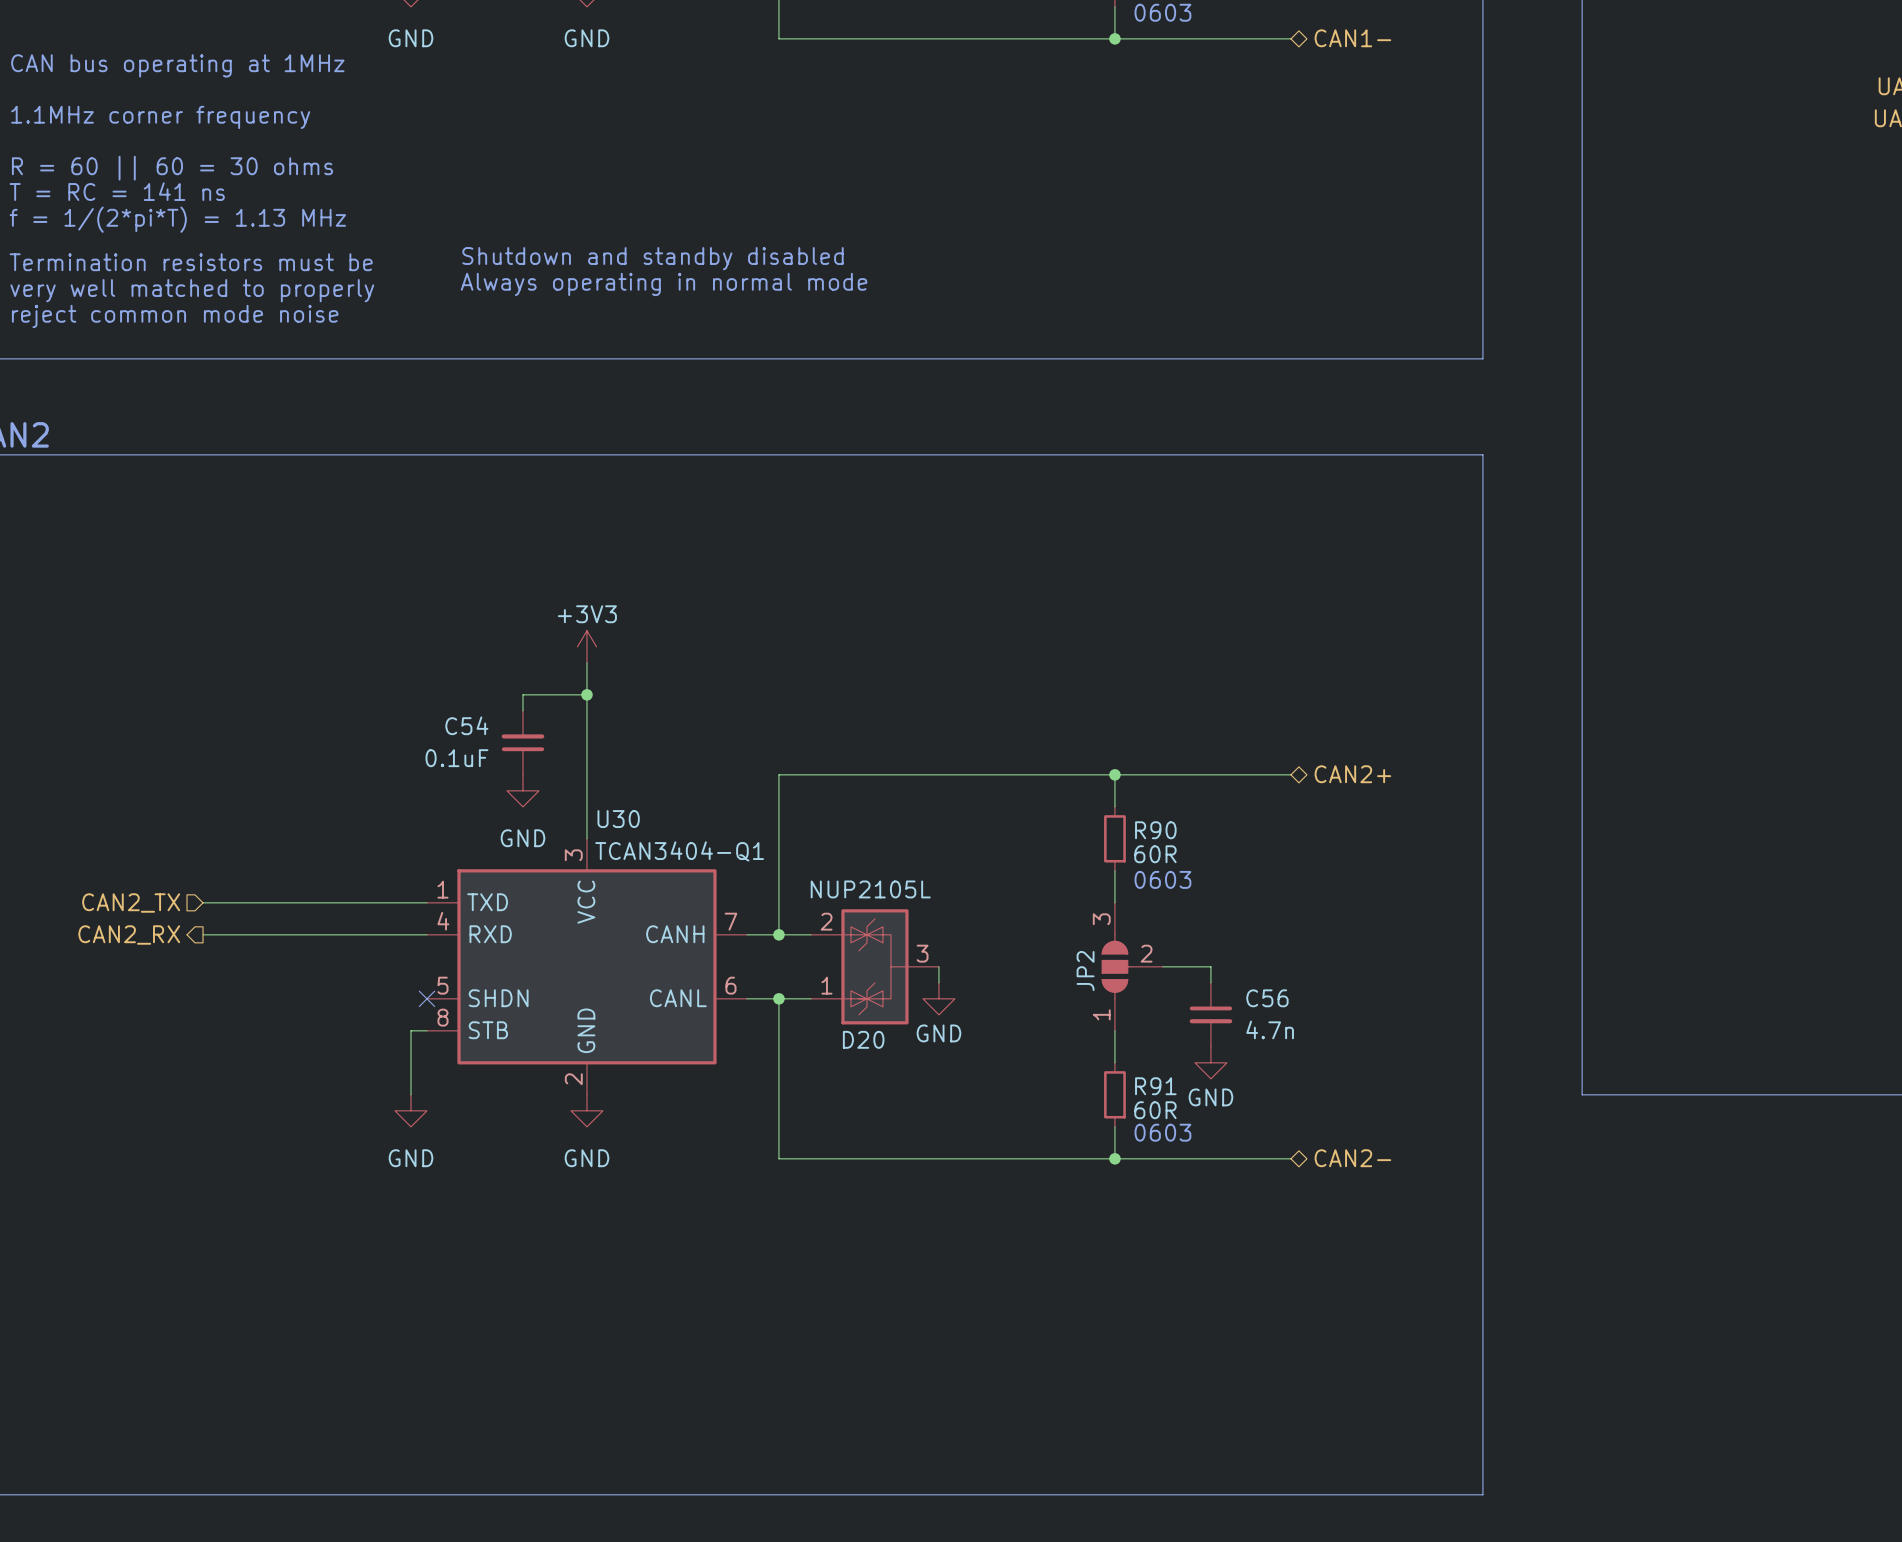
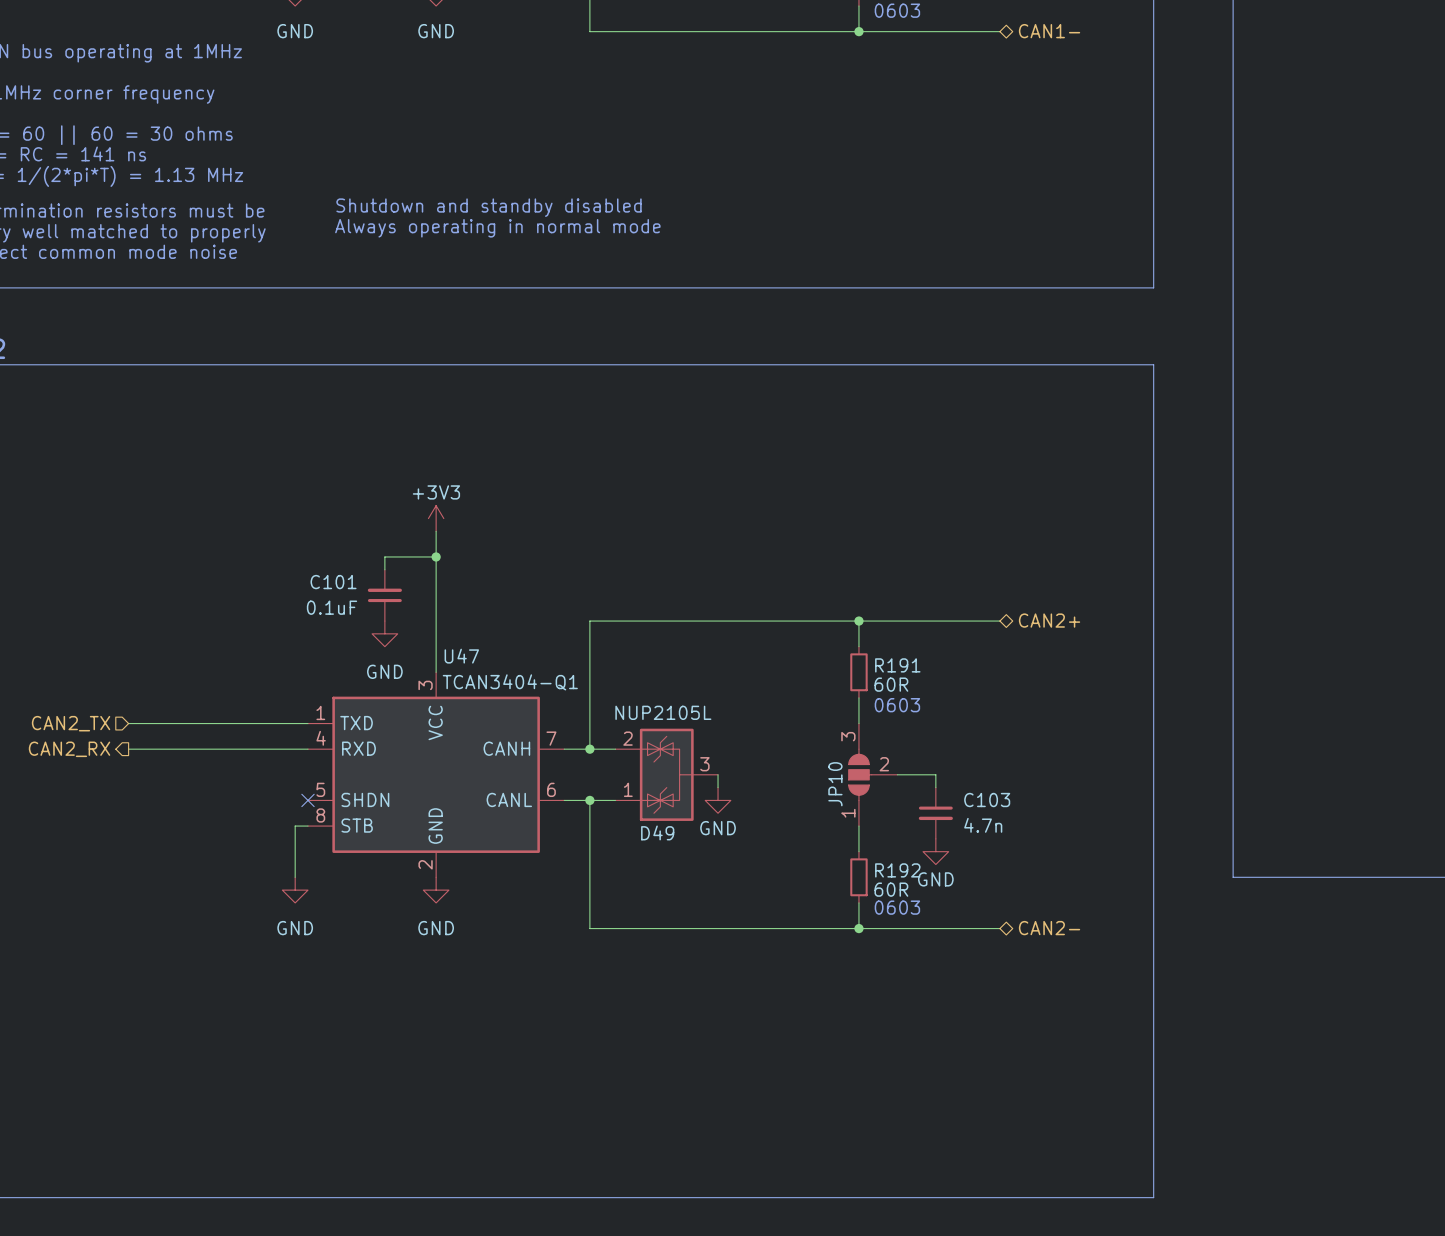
C54 name: C54 (466, 725) -> C101 (333, 582)
U30 name: U30 (618, 819) -> U47 (461, 656)
R90 name: R90 (1155, 830) -> R191 (897, 665)
JP2 name: JP2 (1085, 971) -> JP10 (835, 784)
C56 name: C56 (1267, 998) -> C103 (987, 800)
D20 name: D20 (863, 1039) -> D49 (657, 832)
R91 name: R91 (1155, 1086) -> R192 (897, 870)

